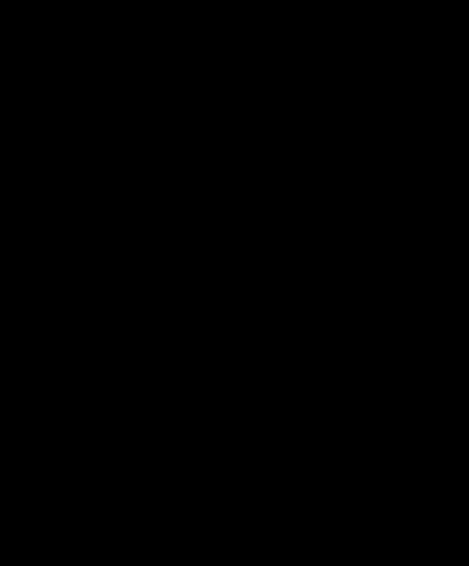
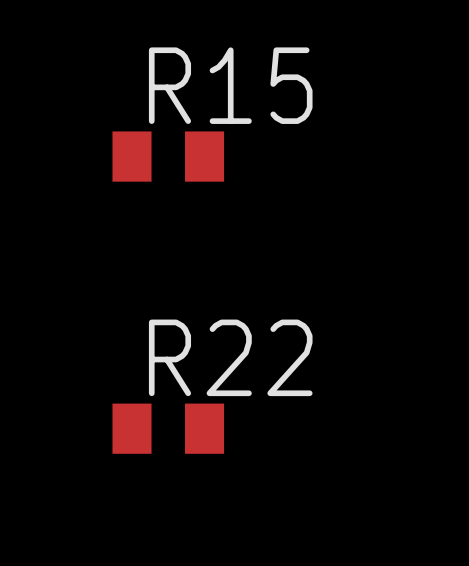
R15: none -> (168, 156)
R22: none -> (168, 428)

